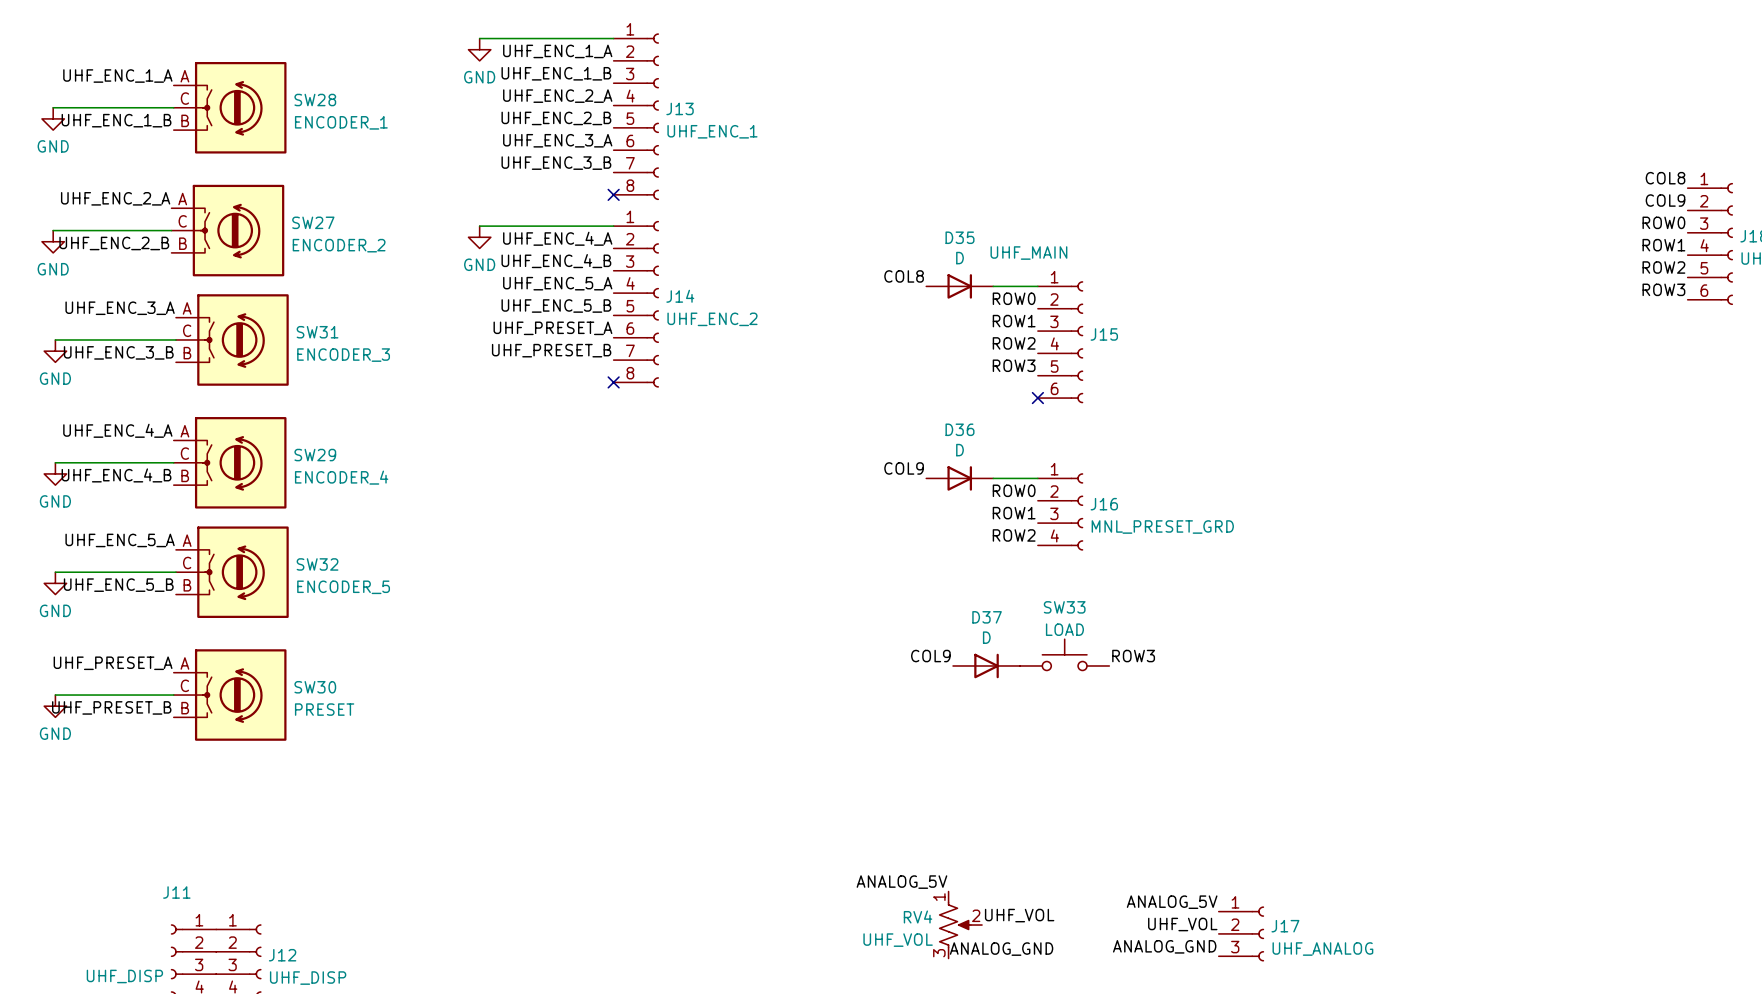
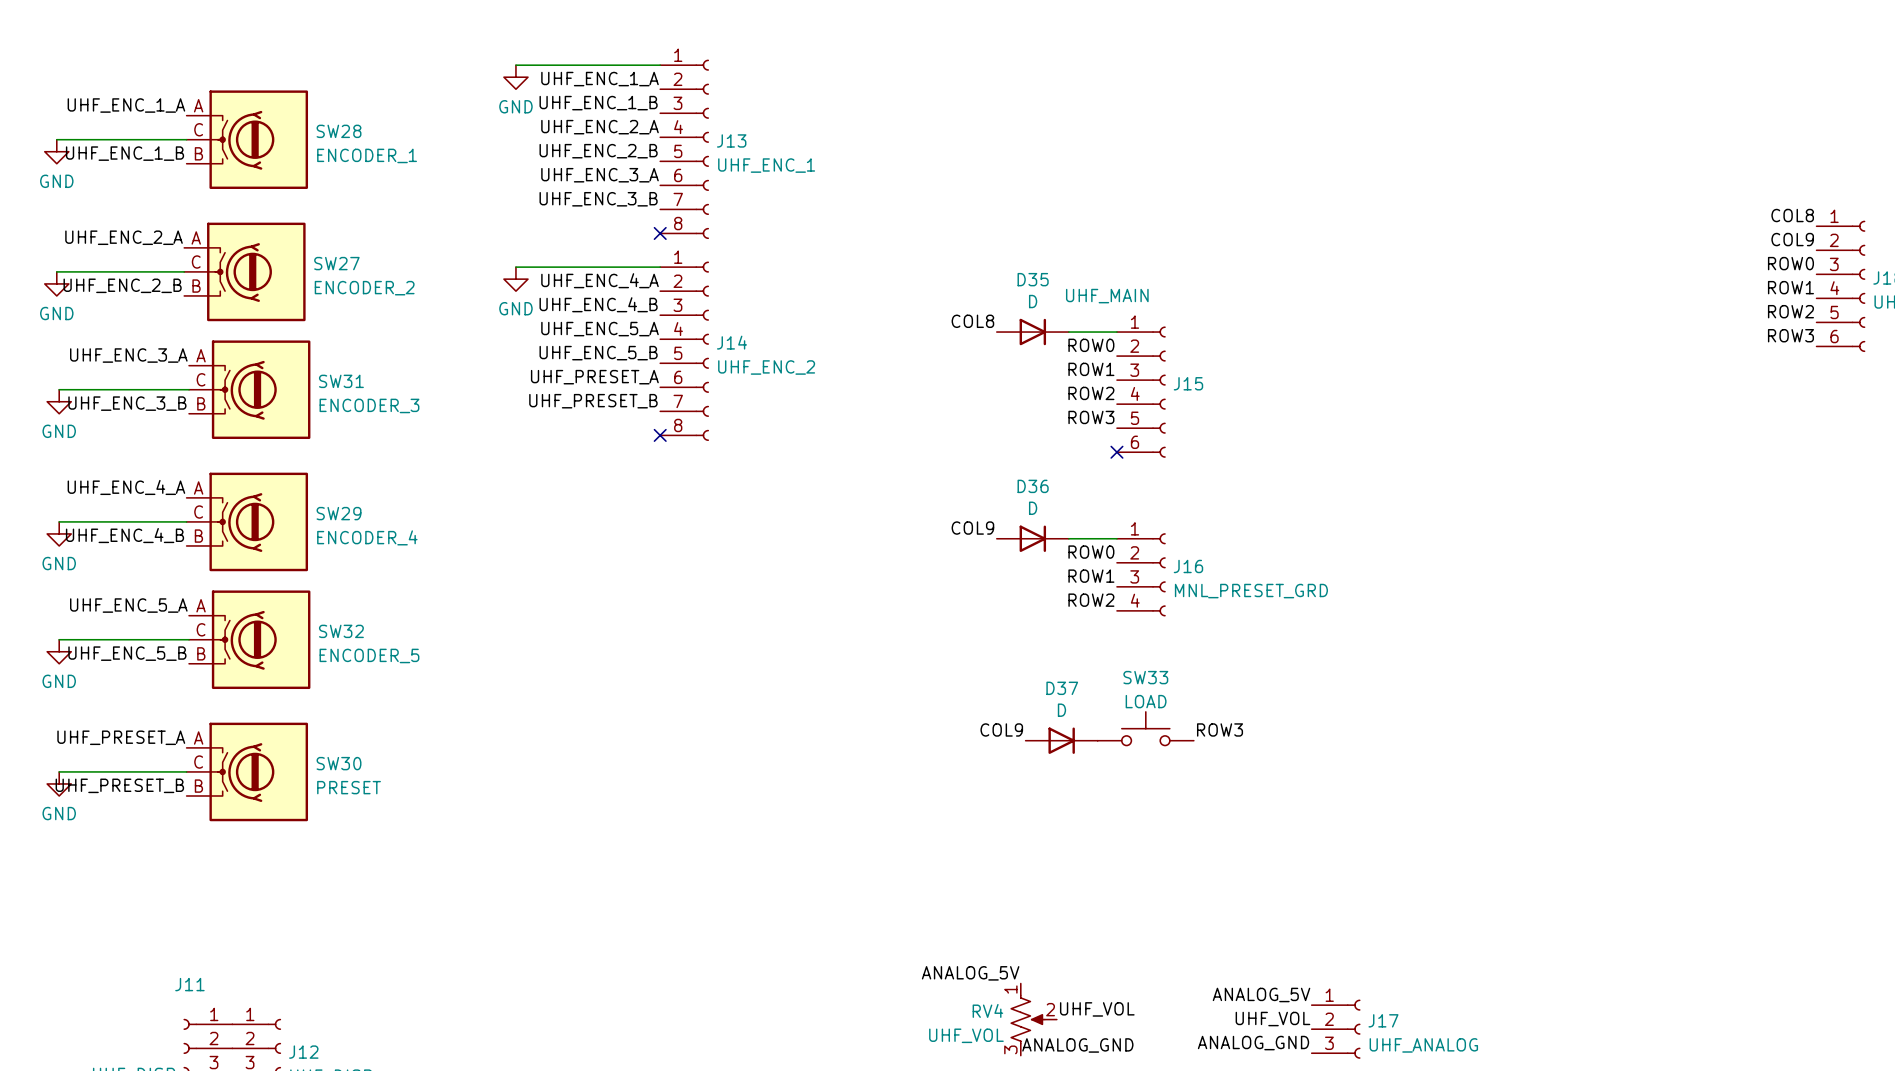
SW28 symbol: [173, 61, 287, 154] -> [186, 90, 309, 189]
SW27 symbol: [171, 184, 285, 277] -> [184, 222, 306, 322]
SW31 symbol: [175, 294, 289, 386] -> [189, 340, 311, 440]
SW29 symbol: [173, 417, 287, 509] -> [186, 472, 309, 572]
SW32 symbol: [175, 526, 289, 618] -> [189, 590, 311, 690]
SW30 symbol: [173, 649, 287, 741] -> [186, 722, 309, 822]

